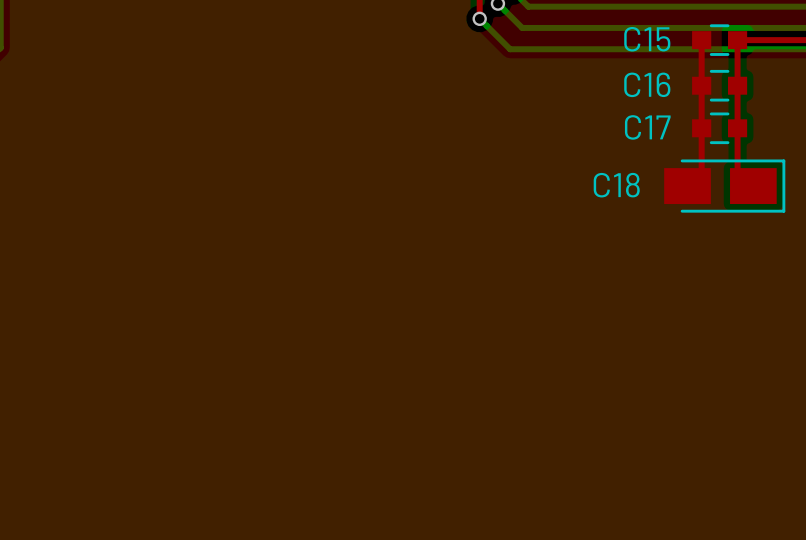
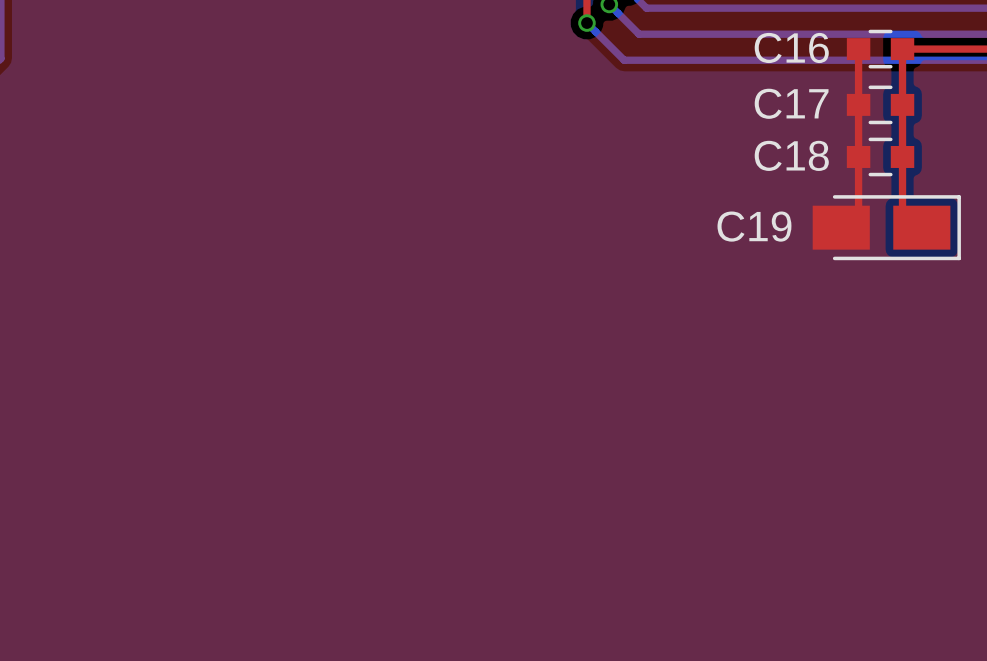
C15 name: C15 (647, 39) -> C16 (791, 47)
C16 name: C16 (647, 84) -> C17 (791, 103)
C17 name: C17 (647, 127) -> C18 (791, 155)
C18 name: C18 (616, 185) -> C19 (754, 226)

